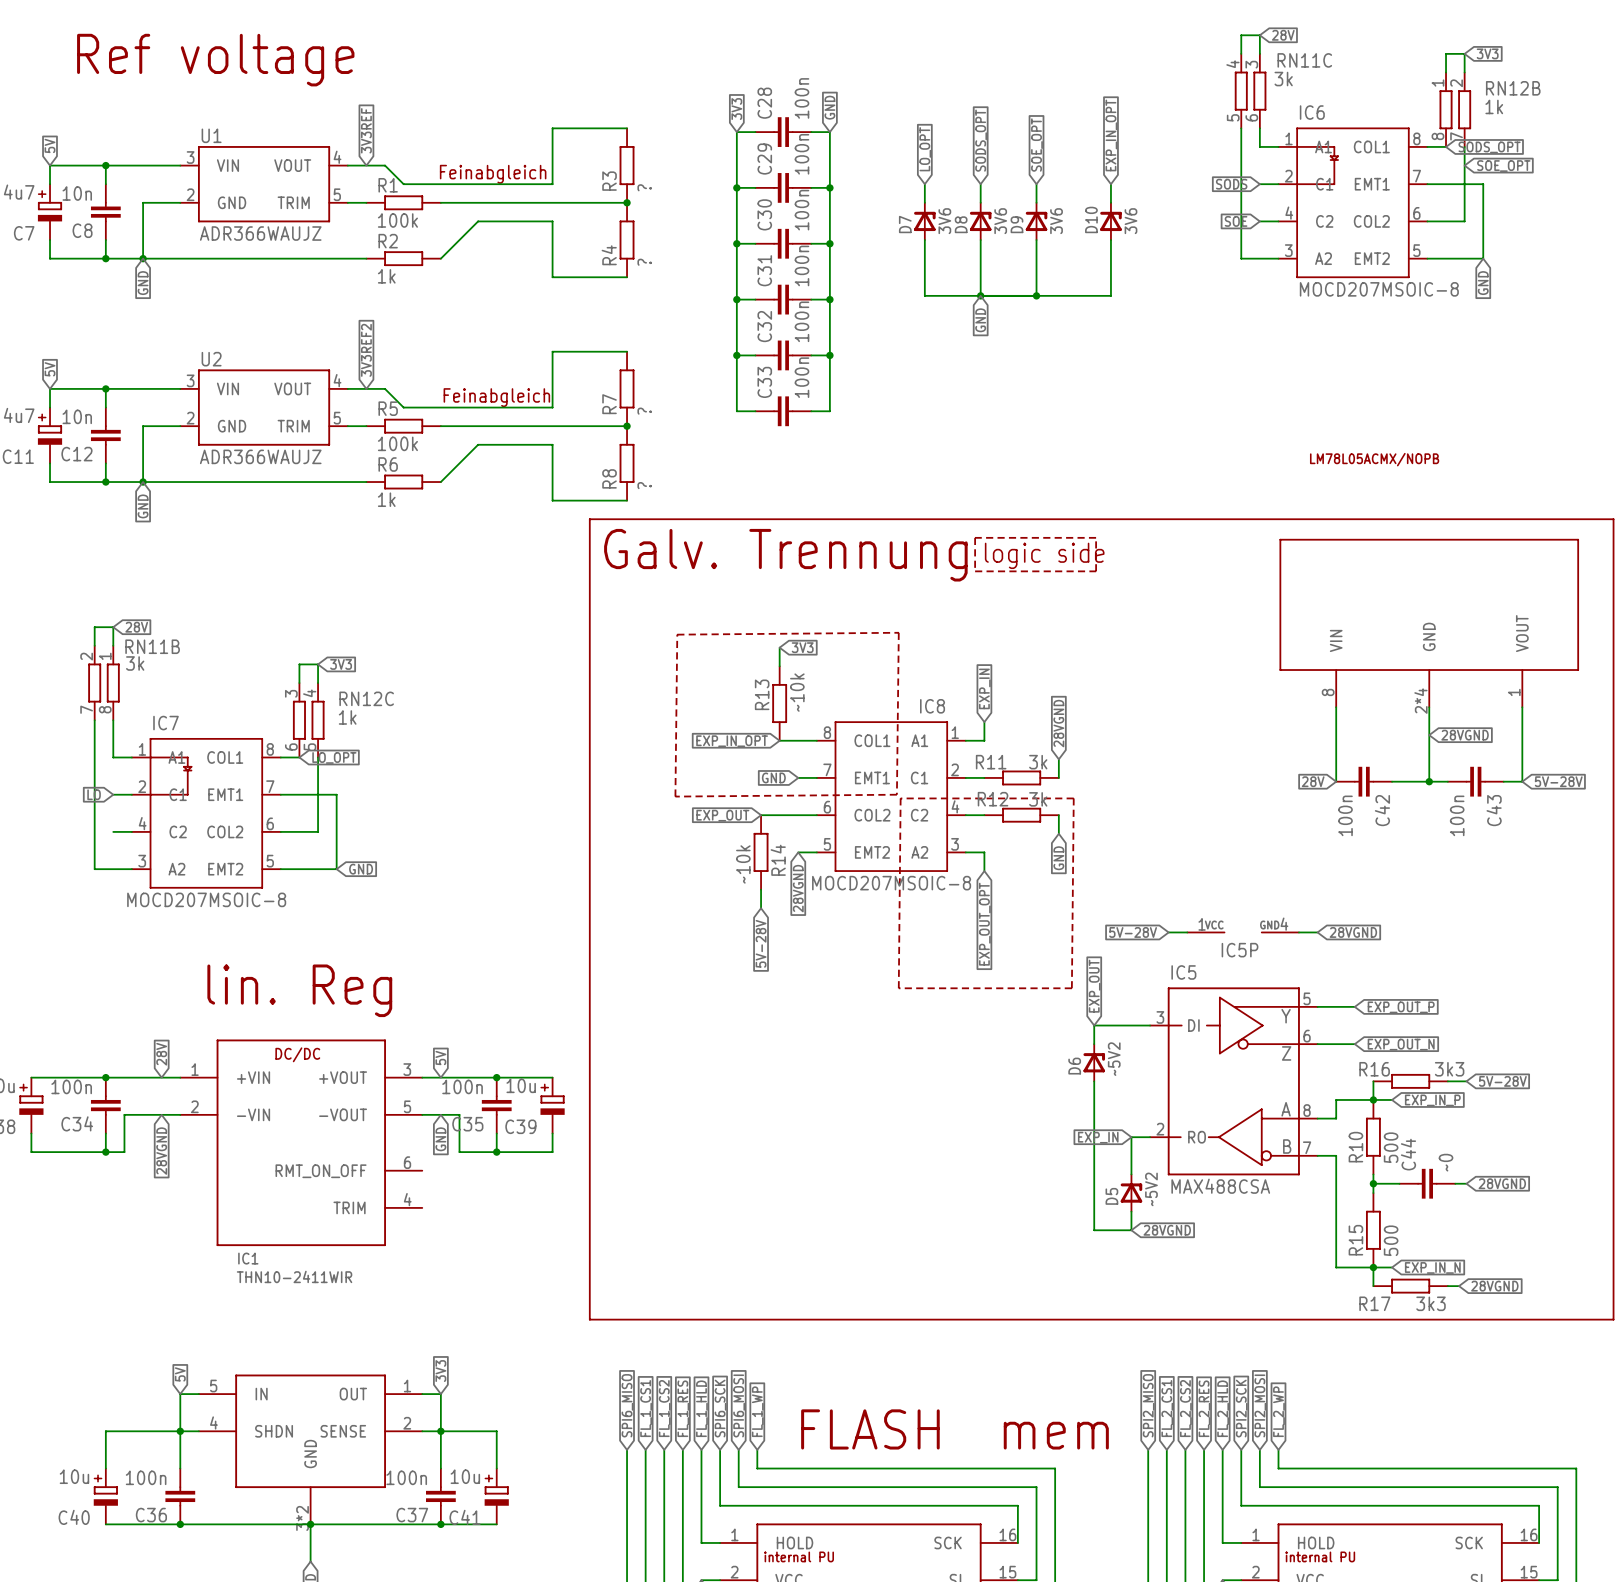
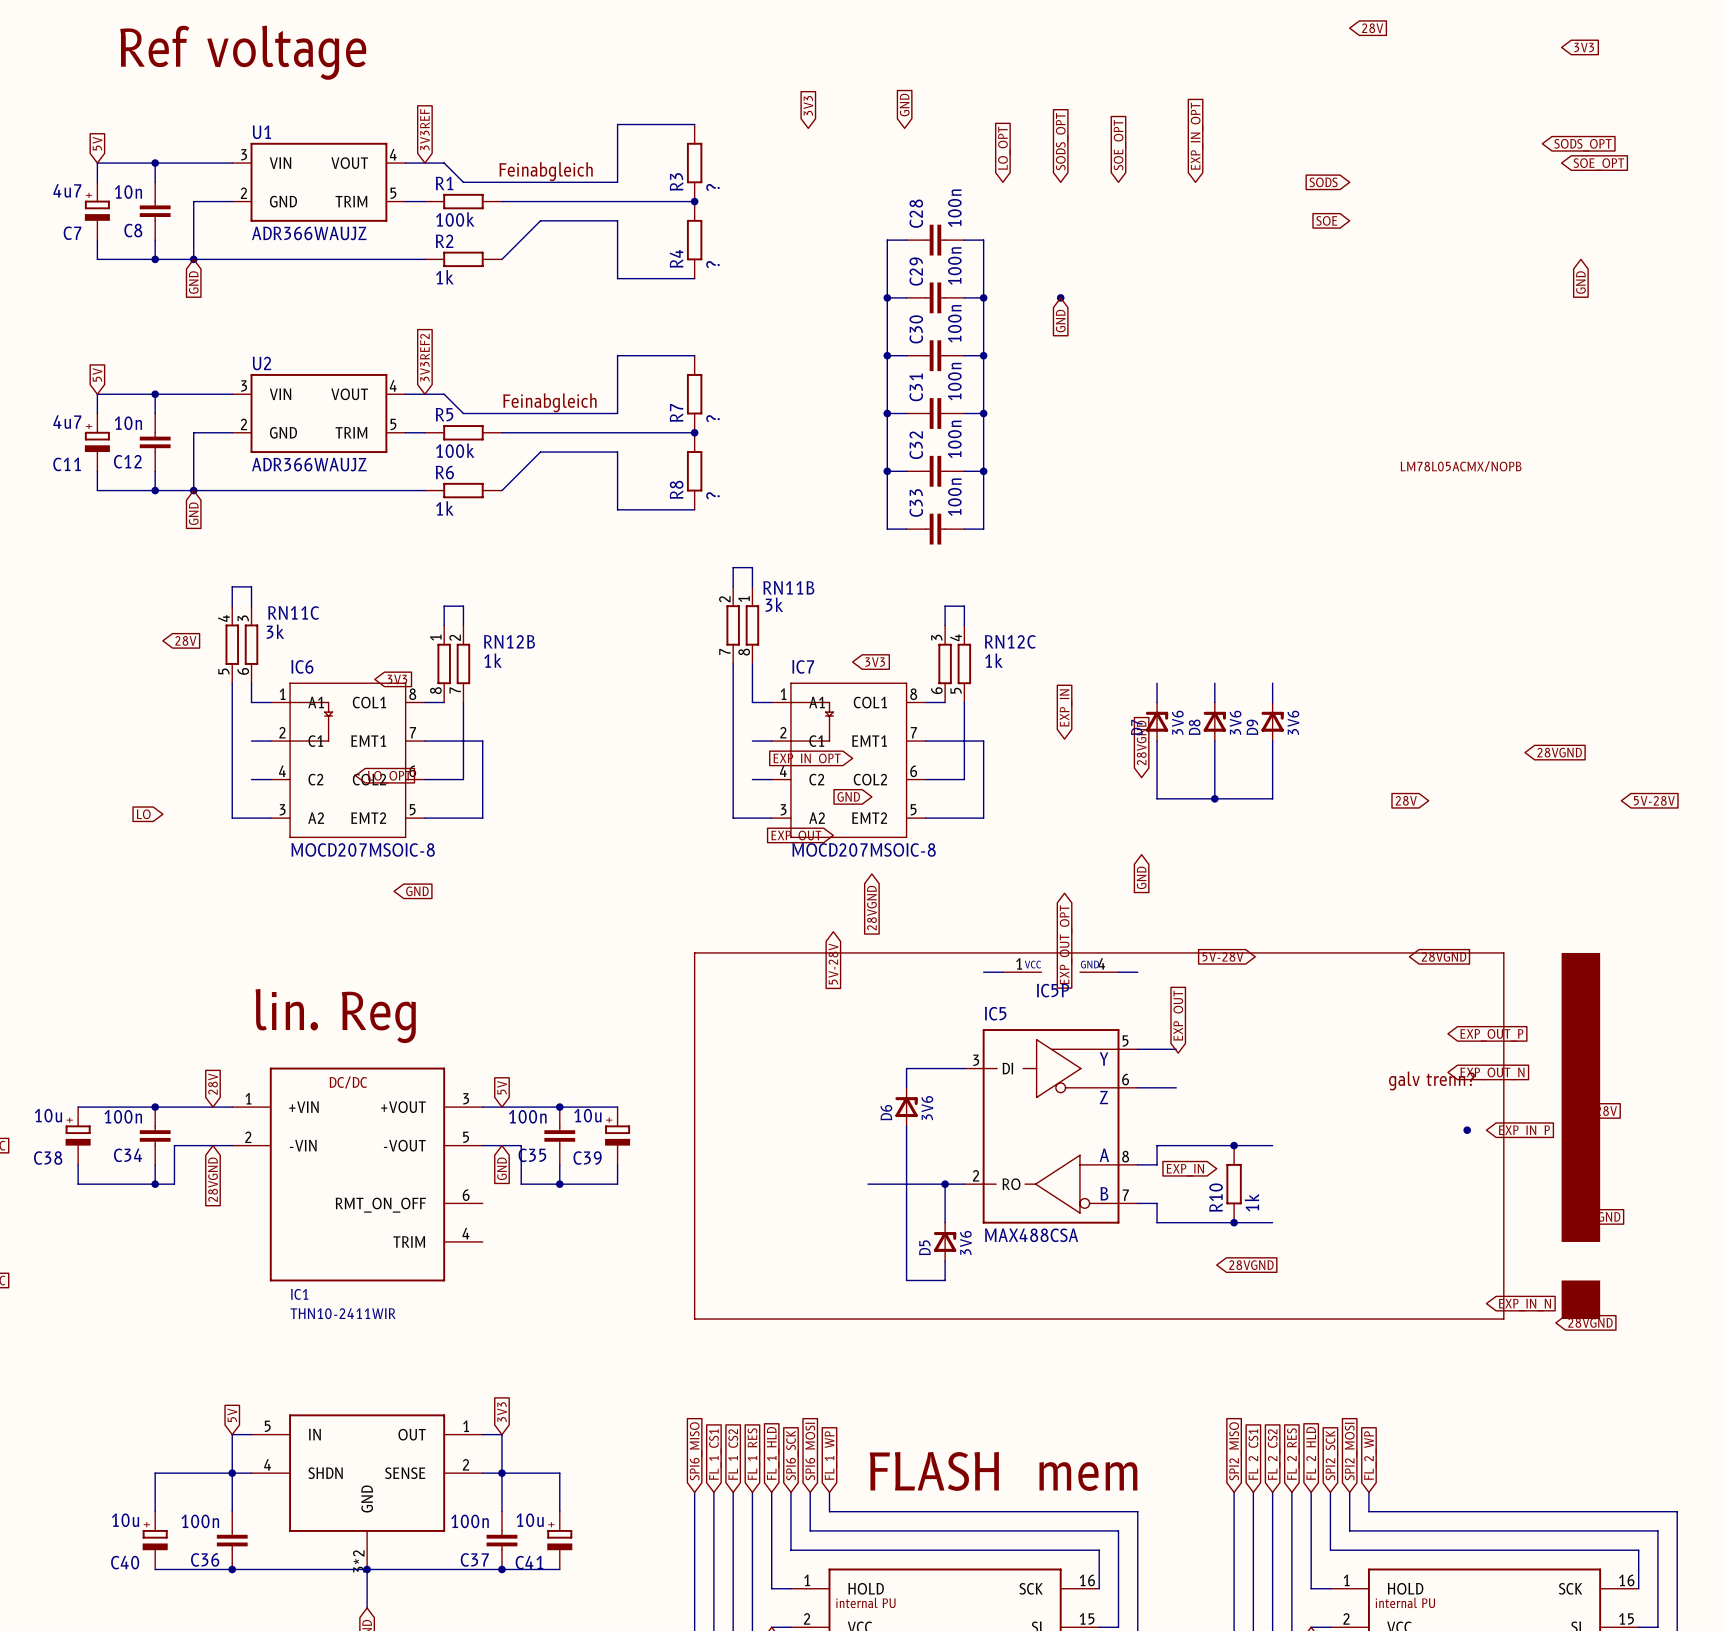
wire: (1241, 53) (1241, 35) (1259, 35) (1259, 53) -> none
wire: (1446, 72) (1446, 53) (1464, 53) (1464, 72) -> none
part: (1241, 91) -> none
RN11C position: (1259, 91) -> (251, 644)
part: (1446, 109) -> none
RN12B position: (1464, 109) -> (463, 663)
wire: (1241, 128) (1241, 258) (1278, 258) -> none
wire: (1259, 128) (1259, 146) (1278, 146) -> none
wire: (755, 132) (736, 132) (736, 411) (755, 411) -> (906, 240) (887, 240) (887, 529) (906, 529)
C28 position: (783, 132) -> (935, 240)
wire: (811, 132) (829, 132) (829, 411) (811, 411) -> (964, 240) (983, 240) (983, 529) (964, 529)
line: (1297, 146) (1334, 146) (1334, 156) -> none
wire: (1427, 146) (1446, 146) -> none
wire: (1464, 146) (1464, 221) (1427, 221) -> none
line: (1330, 160) (1338, 160) -> none
line: (1334, 160) (1334, 184) (1297, 184) -> none
line: (1334, 160) (1338, 156) (1330, 156) (1334, 160) -> none
wire: (924, 184) (924, 202) -> none
wire: (980, 184) (980, 202) -> none
wire: (1036, 184) (1036, 202) -> none
wire: (1110, 184) (1110, 202) -> none
wire: (1259, 184) (1278, 184) -> none
wire: (1427, 184) (1483, 184) (1483, 258) (1427, 258) -> none
wire: (736, 187) (755, 187) -> (887, 297) (906, 297)
junction: (736, 187) -> none
C29 position: (783, 187) -> (935, 297)
wire: (811, 187) (829, 187) -> (964, 297) (983, 297)
junction: (829, 187) -> none
IC6 position: (1352, 202) -> (347, 760)
D7 position: (924, 221) -> (1157, 721)
D8 position: (980, 221) -> (1214, 721)
D9 position: (1036, 221) -> (1272, 721)
D10: 3V6 (1110, 221) -> none
wire: (1259, 221) (1278, 221) -> none
wire: (924, 240) (924, 295) (1110, 295) (1110, 240) -> none
wire: (980, 240) (980, 295) -> none
wire: (1036, 240) (1036, 295) -> none
wire: (736, 243) (755, 243) -> (887, 355) (906, 355)
junction: (736, 243) -> none
C30 position: (783, 243) -> (935, 355)
wire: (811, 243) (829, 243) -> (964, 355) (983, 355)
junction: (829, 243) -> none
junction: none -> (983, 297)
junction: (1036, 295) -> none
wire: (736, 299) (755, 299) -> (887, 413) (906, 413)
junction: (736, 299) -> none
C31 position: (783, 299) -> (935, 413)
wire: (811, 299) (829, 299) -> (964, 413) (983, 413)
junction position: (829, 299) -> (887, 297)
junction: none -> (983, 355)
wire: (736, 355) (755, 355) -> (887, 471) (906, 471)
junction: (736, 355) -> none
C32 position: (783, 355) -> (935, 471)
wire: (811, 355) (829, 355) -> (964, 471) (983, 471)
junction position: (829, 355) -> (887, 355)
junction: none -> (887, 413)
junction: none -> (983, 413)
C33 position: (783, 411) -> (935, 529)
junction: none -> (887, 471)
junction: none -> (983, 471)
line: (589, 519) (589, 1319) (1613, 1319) (1613, 519) (589, 519) -> none
line: (975, 537) (1096, 537) (1096, 571) (975, 571) (975, 537) -> none
text: Galv. Trennung (785, 555) -> none
text: logic side (1044, 555) -> none
wire: none -> (733, 586) (733, 567) (752, 567) (752, 586)
part: none -> (752, 625)
wire: none -> (945, 625) (945, 606) (964, 606) (964, 625)
part: (1429, 623) -> none
line: (898, 632) (677, 634) (675, 796) (896, 794) (898, 632) -> none
wire: (94, 645) (94, 627) (113, 627) (113, 645) -> (232, 606) (232, 586) (251, 586) (251, 606)
wire: (779, 647) (779, 666) -> none
part: none -> (444, 663)
wire: none -> (733, 663) (733, 818) (771, 818)
wire: none -> (752, 663) (752, 702) (771, 702)
part: none -> (964, 663)
wire: none -> (232, 683) (232, 818) (270, 818)
wire: none -> (251, 683) (251, 702) (270, 702)
wire: none -> (1272, 683) (1272, 702)
RN11B position: (94, 683) -> (733, 625)
part: (113, 683) -> none
wire: (299, 683) (299, 664) (318, 664) (318, 683) -> (444, 625) (444, 606) (463, 606) (463, 625)
line: none -> (790, 702) (829, 702) (829, 712)
wire: none -> (964, 702) (964, 779) (925, 779)
line: none -> (825, 715) (833, 715)
line: none -> (829, 715) (829, 741) (790, 741)
line: none -> (829, 715) (833, 712) (825, 712) (829, 715)
R13: ~10k (779, 703) -> none
wire: (1336, 707) (1336, 781) -> none
wire: (1429, 707) (1429, 781) -> none
wire: (1522, 707) (1522, 781) (1503, 781) -> none
wire: (94, 720) (94, 869) (131, 869) -> none
wire: (113, 720) (113, 757) (131, 757) -> none
RN12C position: (299, 720) -> (945, 663)
part position: (318, 720) -> (232, 644)
wire: (984, 722) (984, 740) (965, 740) -> none
wire: none -> (925, 741) (983, 741) (983, 818) (925, 818)
wire: none -> (1157, 741) (1157, 798) (1272, 798) (1272, 741)
wire: none -> (1214, 741) (1214, 798)
wire: (779, 740) (816, 740) -> none
line: (150, 757) (187, 757) (187, 766) -> (290, 702) (328, 702) (328, 712)
wire: (280, 757) (299, 757) -> (424, 702) (444, 702)
wire: (318, 757) (318, 831) (280, 831) -> (463, 702) (463, 779) (424, 779)
wire: (1058, 759) (1058, 777) -> (1157, 683) (1157, 702)
line: (184, 770) (191, 770) -> (324, 715) (332, 715)
line: (187, 770) (187, 794) (150, 794) -> (328, 715) (328, 741) (290, 741)
line: (187, 770) (191, 766) (184, 766) (187, 770) -> (328, 715) (332, 712) (324, 712) (328, 715)
wire: (798, 777) (816, 777) -> (752, 741) (771, 741)
wire: (965, 777) (984, 777) -> (925, 702) (945, 702)
R11: 3k (1021, 777) -> none
junction: none -> (1214, 798)
C42: 100n (1364, 781) -> none
wire: (1392, 781) (1447, 781) -> none
junction: (1429, 781) -> none
C43: 100n (1475, 781) -> none
wire: (113, 794) (131, 794) -> (251, 741) (270, 741)
wire: (280, 794) (336, 794) (336, 869) (280, 869) -> (424, 741) (482, 741) (482, 818) (424, 818)
IC8: MOCD207MSOIC-8 (891, 796) -> none
line: (900, 798) (1073, 798) (1071, 988) (898, 988) (900, 798) -> none
IC7 position: (206, 813) -> (848, 760)
wire: (761, 815) (816, 815) -> none
wire: (965, 815) (984, 815) -> (983, 972) (1002, 972)
R12: 3k (1021, 815) -> none
wire: (1058, 815) (1058, 833) -> (1214, 683) (1214, 702)
wire: (113, 831) (131, 831) -> (251, 779) (270, 779)
R14: ~10k (761, 852) -> none
wire: (798, 852) (816, 852) -> (752, 779) (771, 779)
wire: (965, 852) (984, 852) (984, 871) -> none
wire: (761, 889) (761, 908) -> none
IC7 value position: MOCD207MSOIC-8 (206, 899) -> MOCD207MSOIC-8 (864, 849)
line: none -> (694, 952) (694, 1319) (1503, 1319) (1503, 952) (694, 952)
drawing: none -> [1561, 952, 1601, 1242]
wire: (1168, 932) (1187, 932) -> (1118, 972) (1137, 972)
IC5P position: (1243, 932) -> (1060, 972)
wire: (1298, 932) (1317, 932) -> none
wire: (1317, 1006) (1354, 1006) -> none
wire: none -> (1137, 1049) (1176, 1049)
wire: (1150, 1025) (1094, 1025) (1094, 1044) -> none
wire: none -> (964, 1068) (906, 1068) (906, 1087)
wire: (1317, 1044) (1354, 1044) -> none
text: none -> galv trenn? (1431, 1081)
wire: none -> (1137, 1087) (1176, 1087)
D6 value: ~5V2 (1114, 1059) -> 3V6 (927, 1108)
D6 position: (1094, 1062) -> (906, 1107)
wire: (1094, 1081) (1094, 1230) (1131, 1230) (1131, 1211) -> none
IC5 position: (1233, 1081) -> (1051, 1126)
wire: (1373, 1081) (1373, 1099) -> none
R16: 3k3 (1410, 1081) -> none
wire: (1447, 1081) (1466, 1081) -> none
wire: none -> (906, 1126) (906, 1280) (945, 1280) (945, 1261)
wire: (1392, 1099) (1336, 1099) (1336, 1118) (1317, 1118) -> none
junction: none -> (1234, 1145)
wire: none -> (1272, 1145) (1157, 1145) (1157, 1164) (1137, 1164)
wire: (1150, 1137) (1131, 1137) (1131, 1174) -> none
R10 position: (1373, 1137) -> (1234, 1184)
R10 value: 500 (1391, 1147) -> 1k (1251, 1202)
wire: none -> (868, 1184) (964, 1184)
wire: none -> (945, 1184) (945, 1222)
junction: none -> (945, 1184)
wire: (1317, 1155) (1336, 1155) (1336, 1267) (1392, 1267) -> none
wire: none -> (1137, 1203) (1157, 1203) (1157, 1222) (1272, 1222)
wire: (1373, 1174) (1373, 1193) -> none
wire: (1373, 1183) (1399, 1183) -> none
junction: (1373, 1183) -> none
C44: ~0 (1427, 1183) -> none
wire: (1455, 1183) (1466, 1183) -> none
junction: none -> (1234, 1222)
D5 value: ~5V2 (1151, 1189) -> 3V6 (965, 1242)
D5 position: (1131, 1193) -> (945, 1241)
R15: 500 (1373, 1230) -> none
drawing: none -> [1561, 1280, 1601, 1320]
wire: (1373, 1267) (1373, 1286) -> none
junction: (1373, 1267) -> none
R17: 3k3 (1410, 1286) -> none
wire: (1447, 1286) (1459, 1286) -> none

